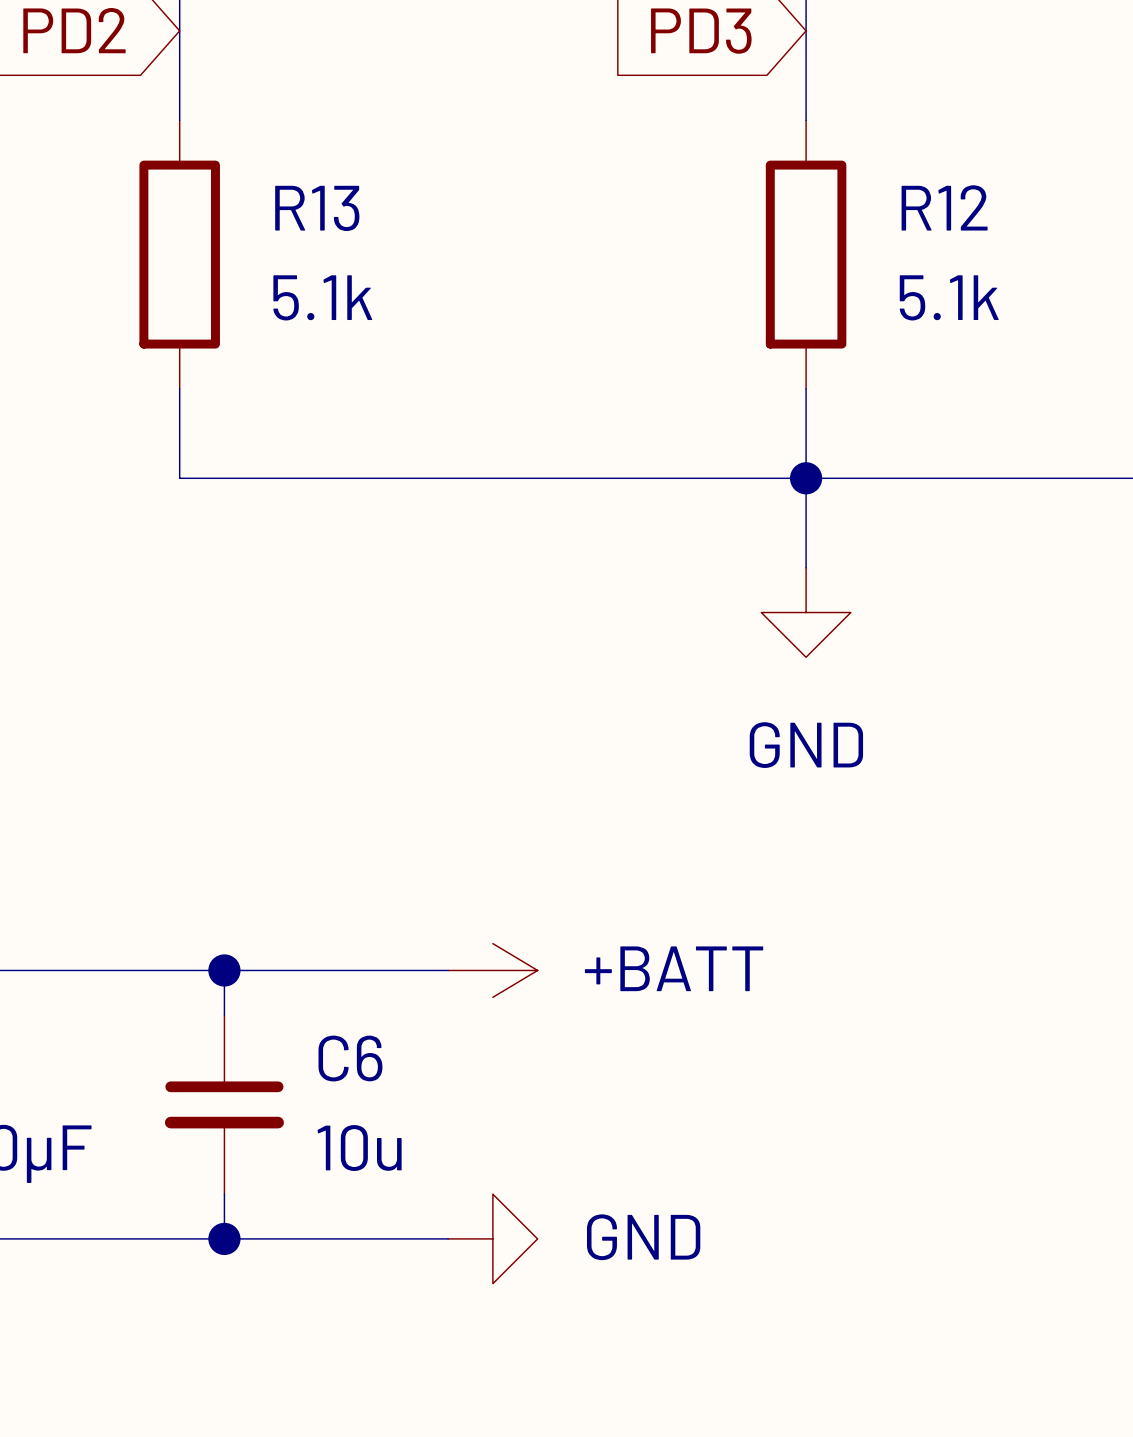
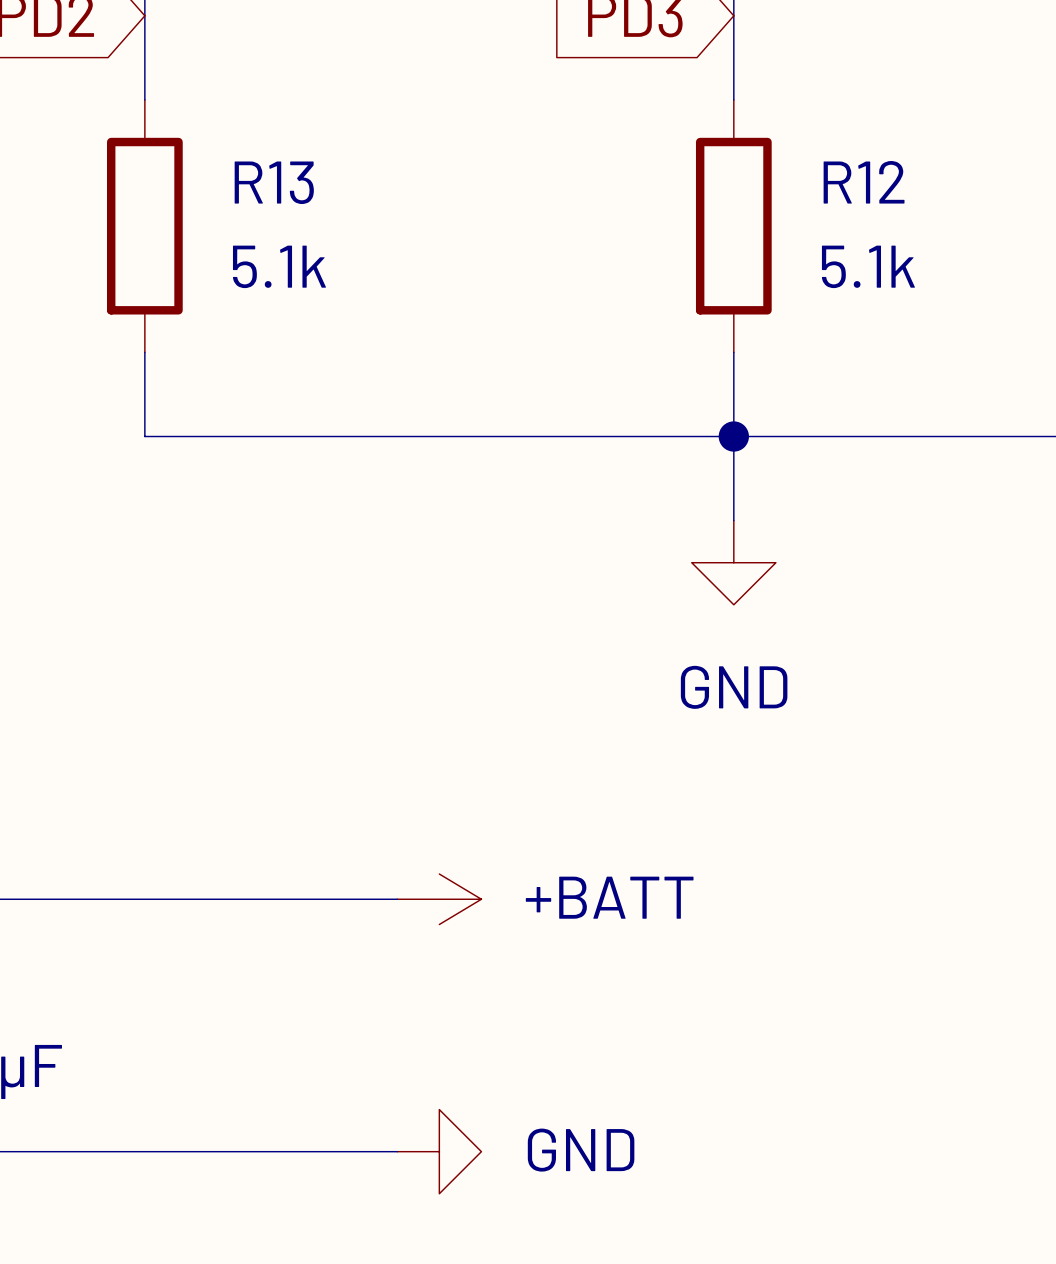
wire: (224, 970) (224, 1015) -> none
junction: (224, 970) -> none
C6: 10u (224, 1104) -> none
wire: (224, 1194) (224, 1238) -> none
junction: (224, 1238) -> none

